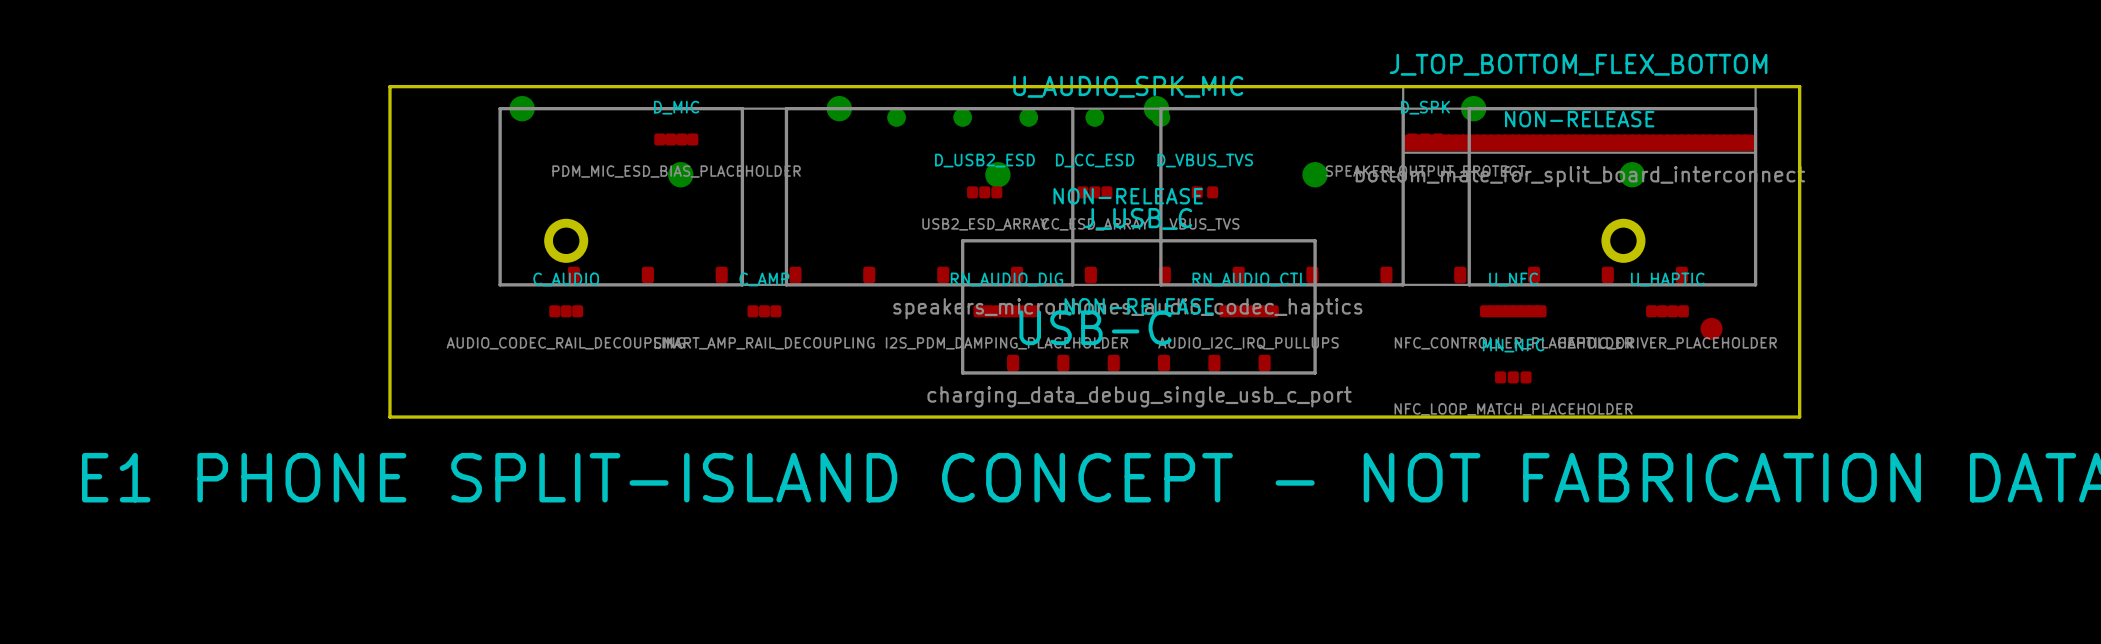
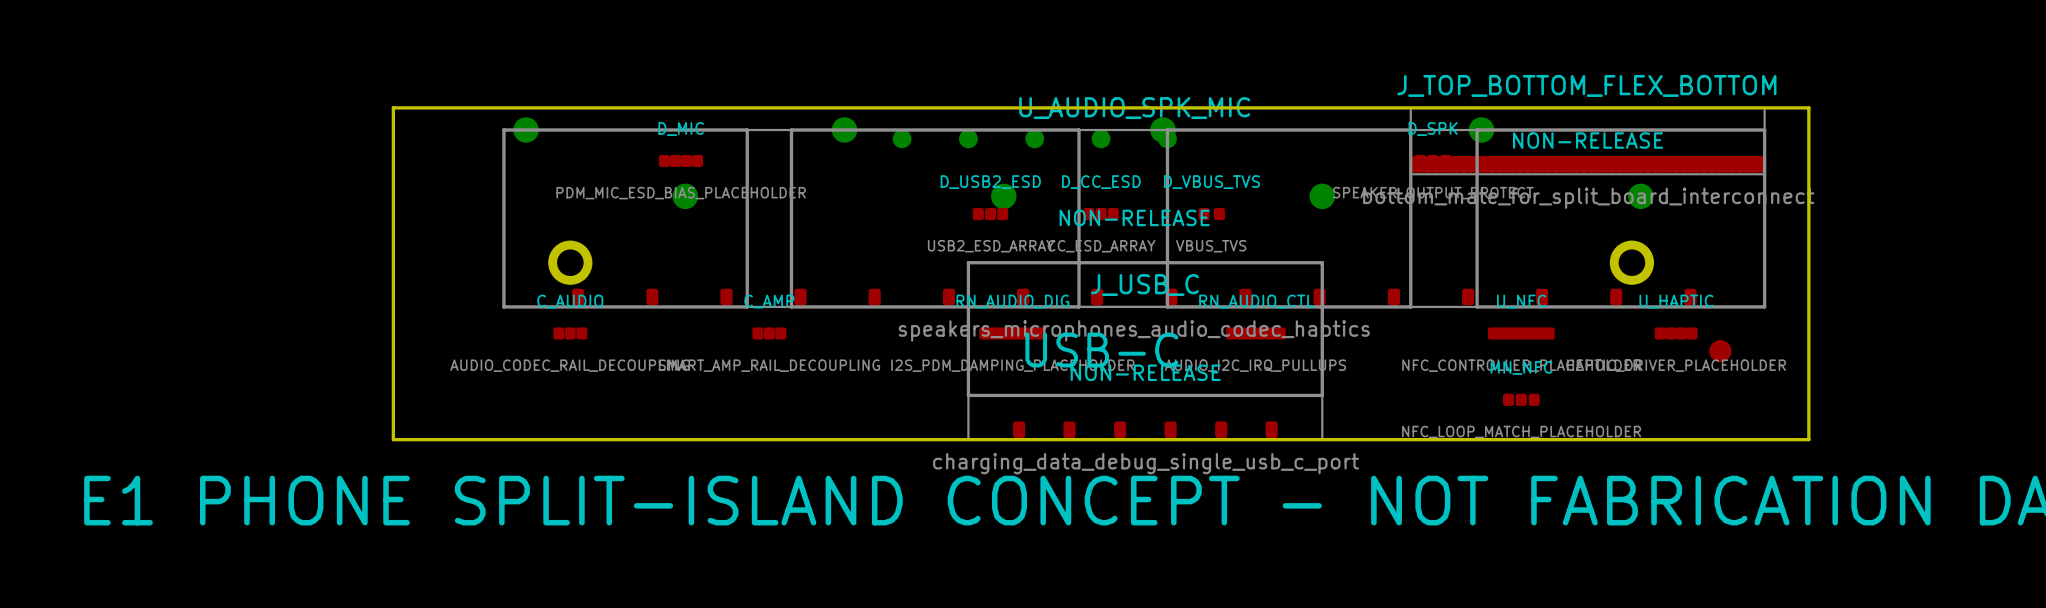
J_USB_C position: (1138, 306) -> (1145, 373)

